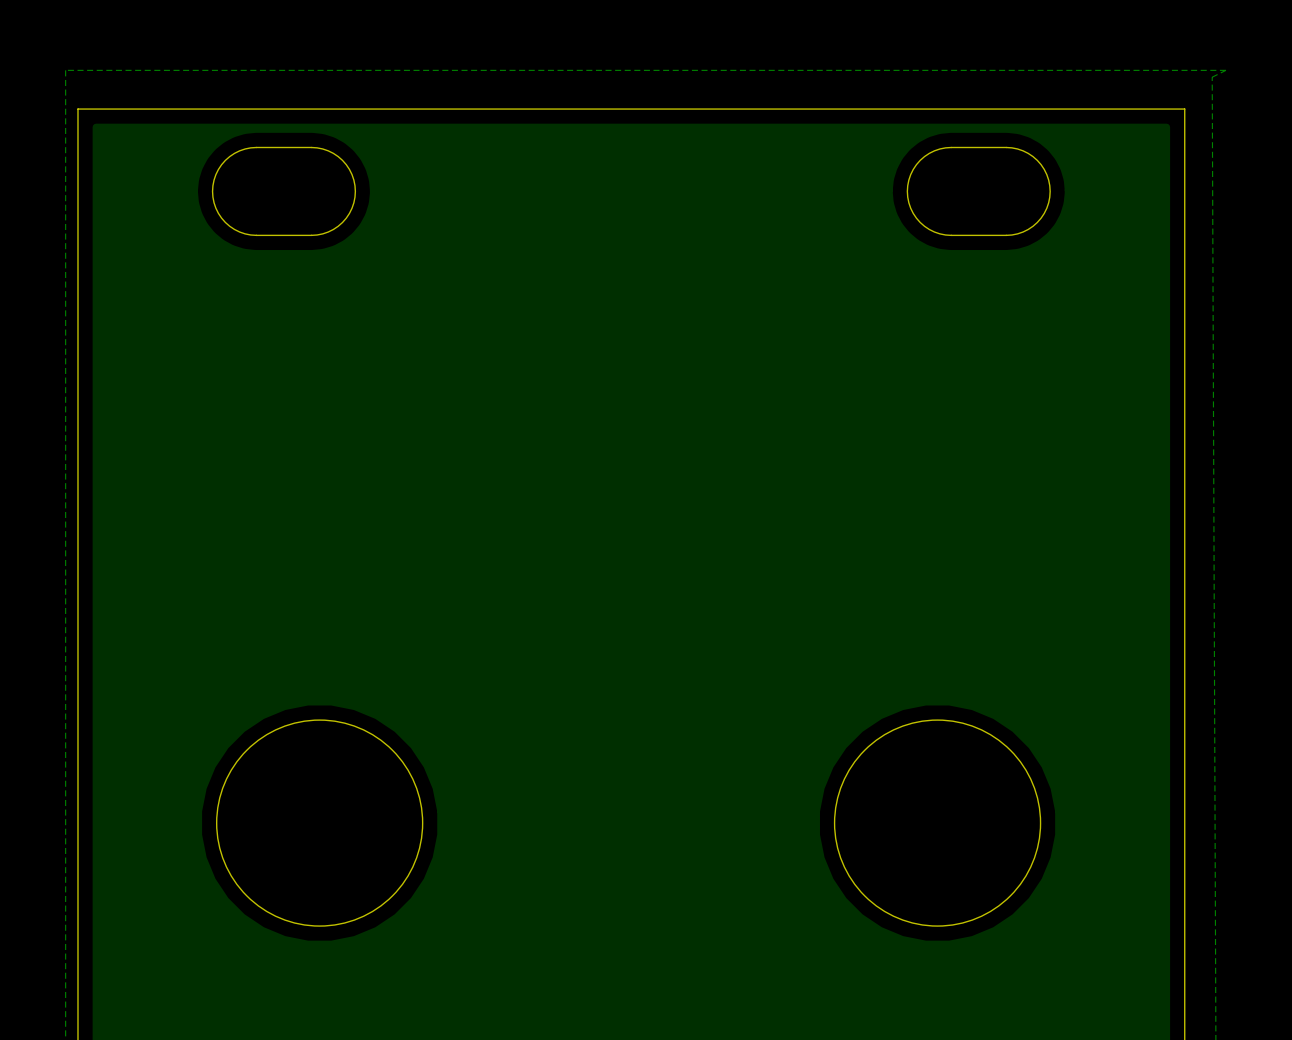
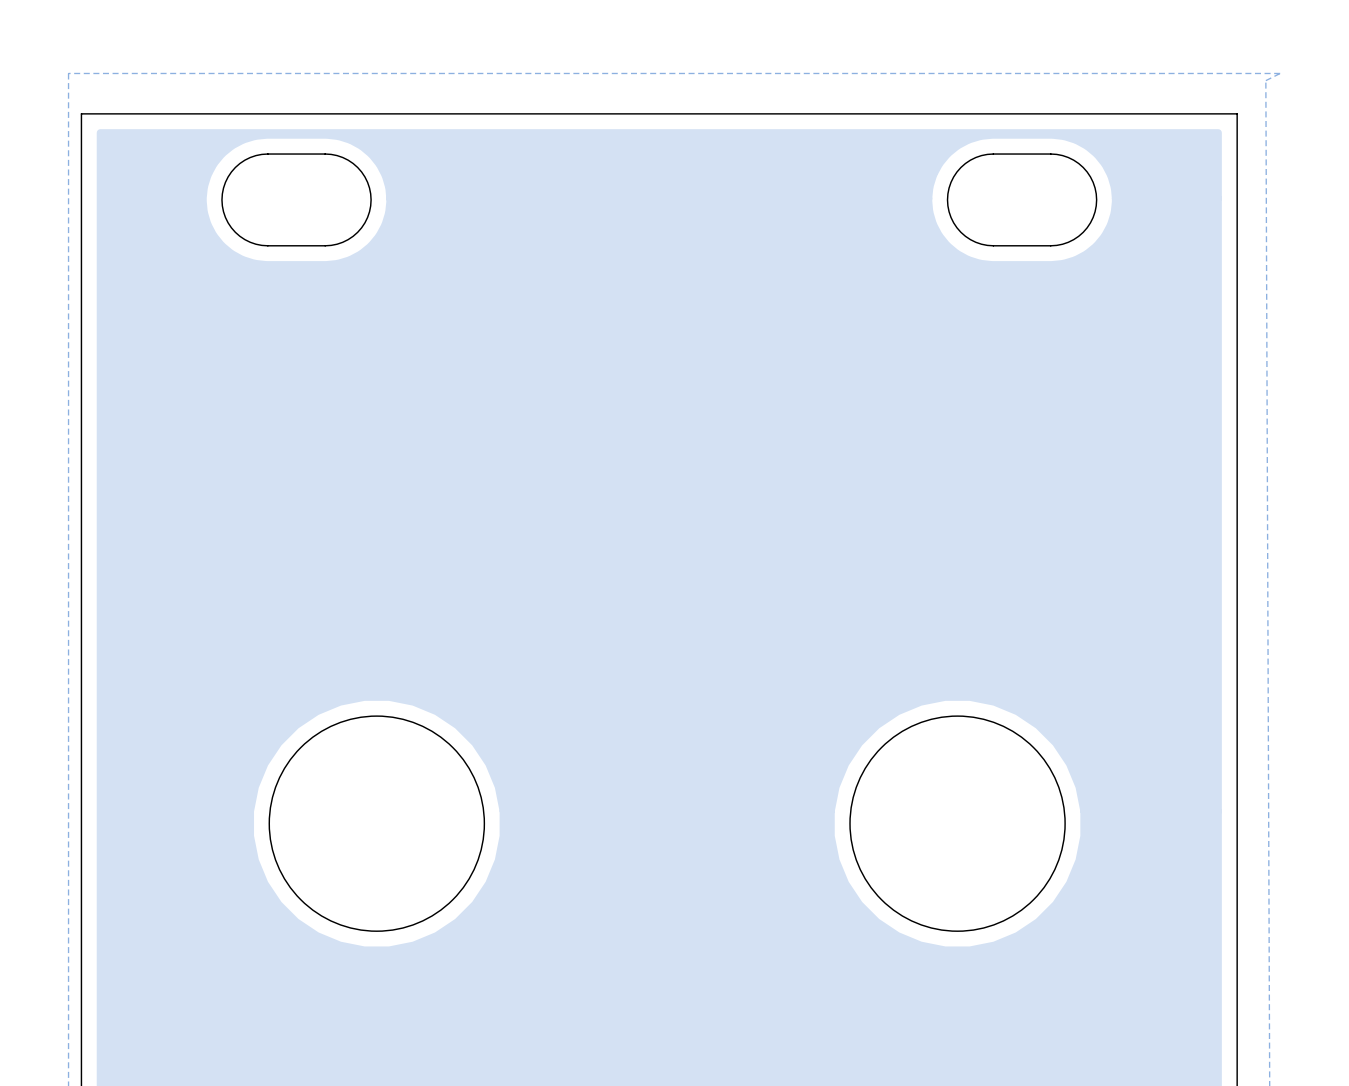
round board edge position: (319, 823) -> (376, 823)
round board edge position: (937, 823) -> (957, 823)

